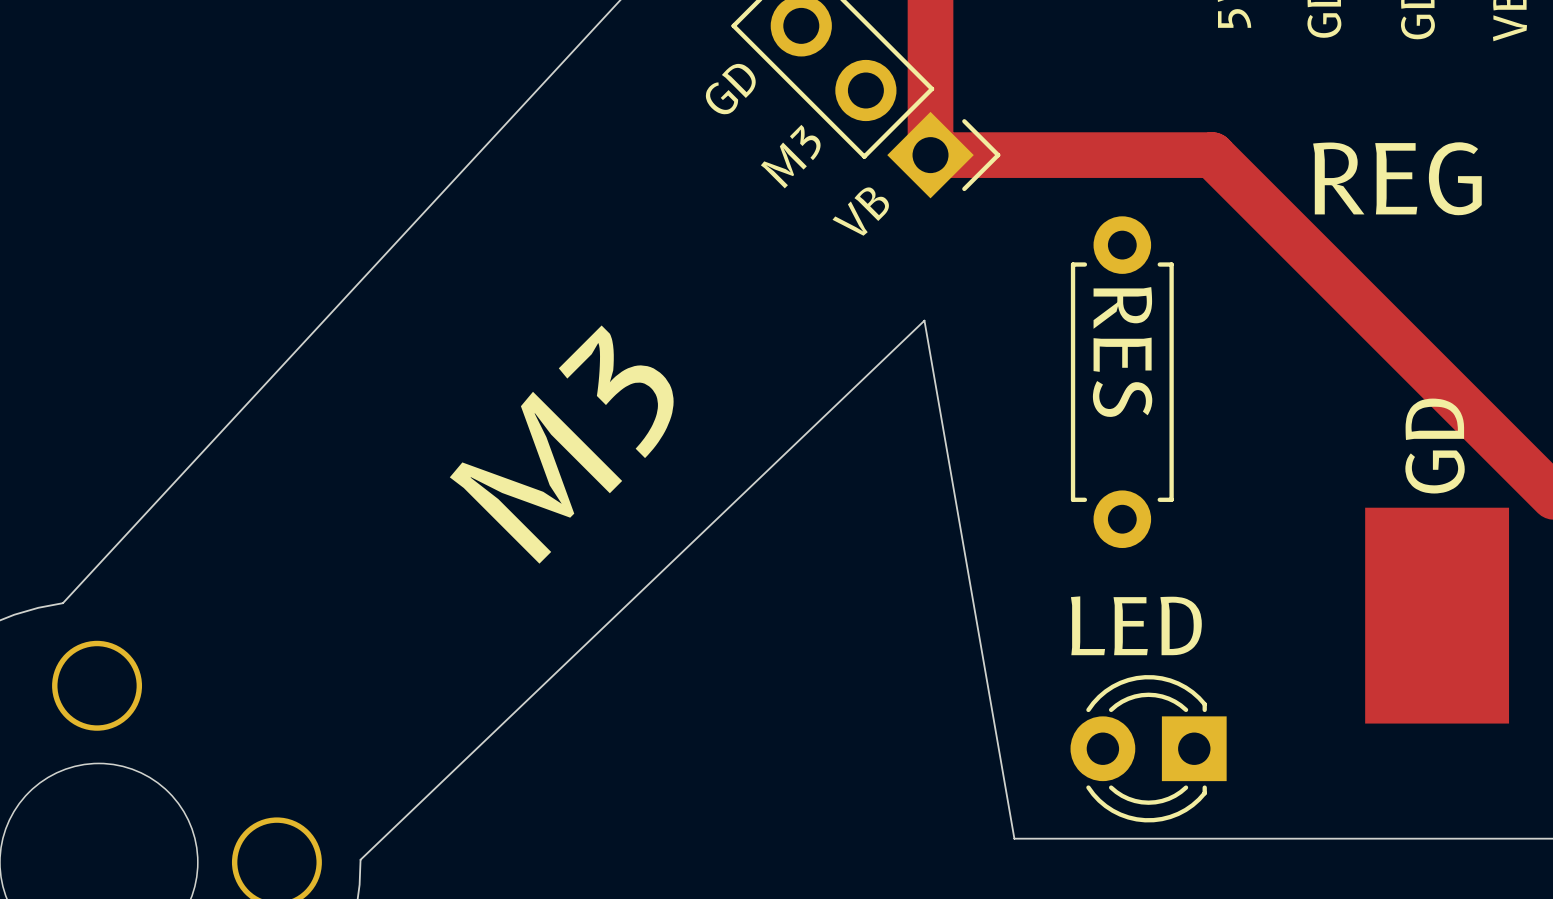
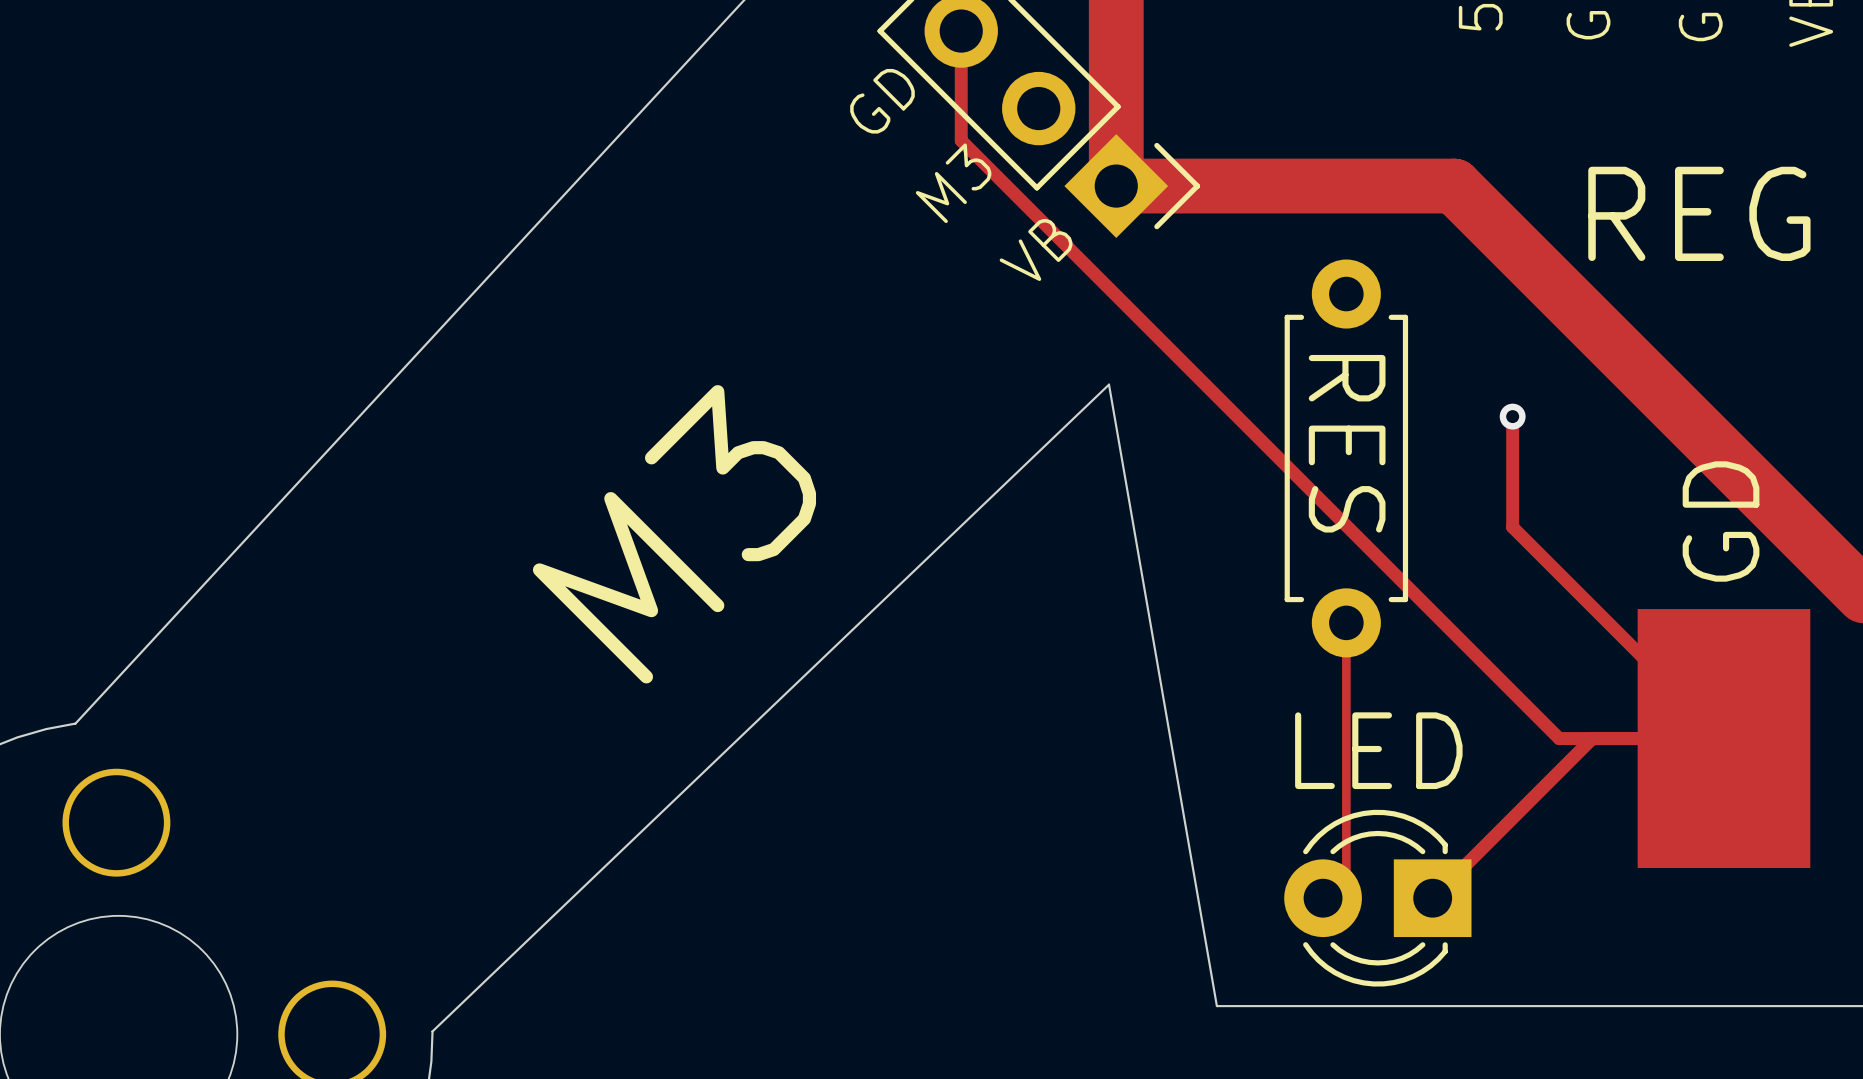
track: none -> (961, 31) (961, 140) (1559, 738) (1723, 738)
track: none -> (1512, 416) (1512, 527) (1723, 738)
via: none -> (1512, 416)
track: none -> (1346, 622) (1346, 874) (1323, 898)
track: none -> (1723, 738) (1592, 738) (1432, 898)

